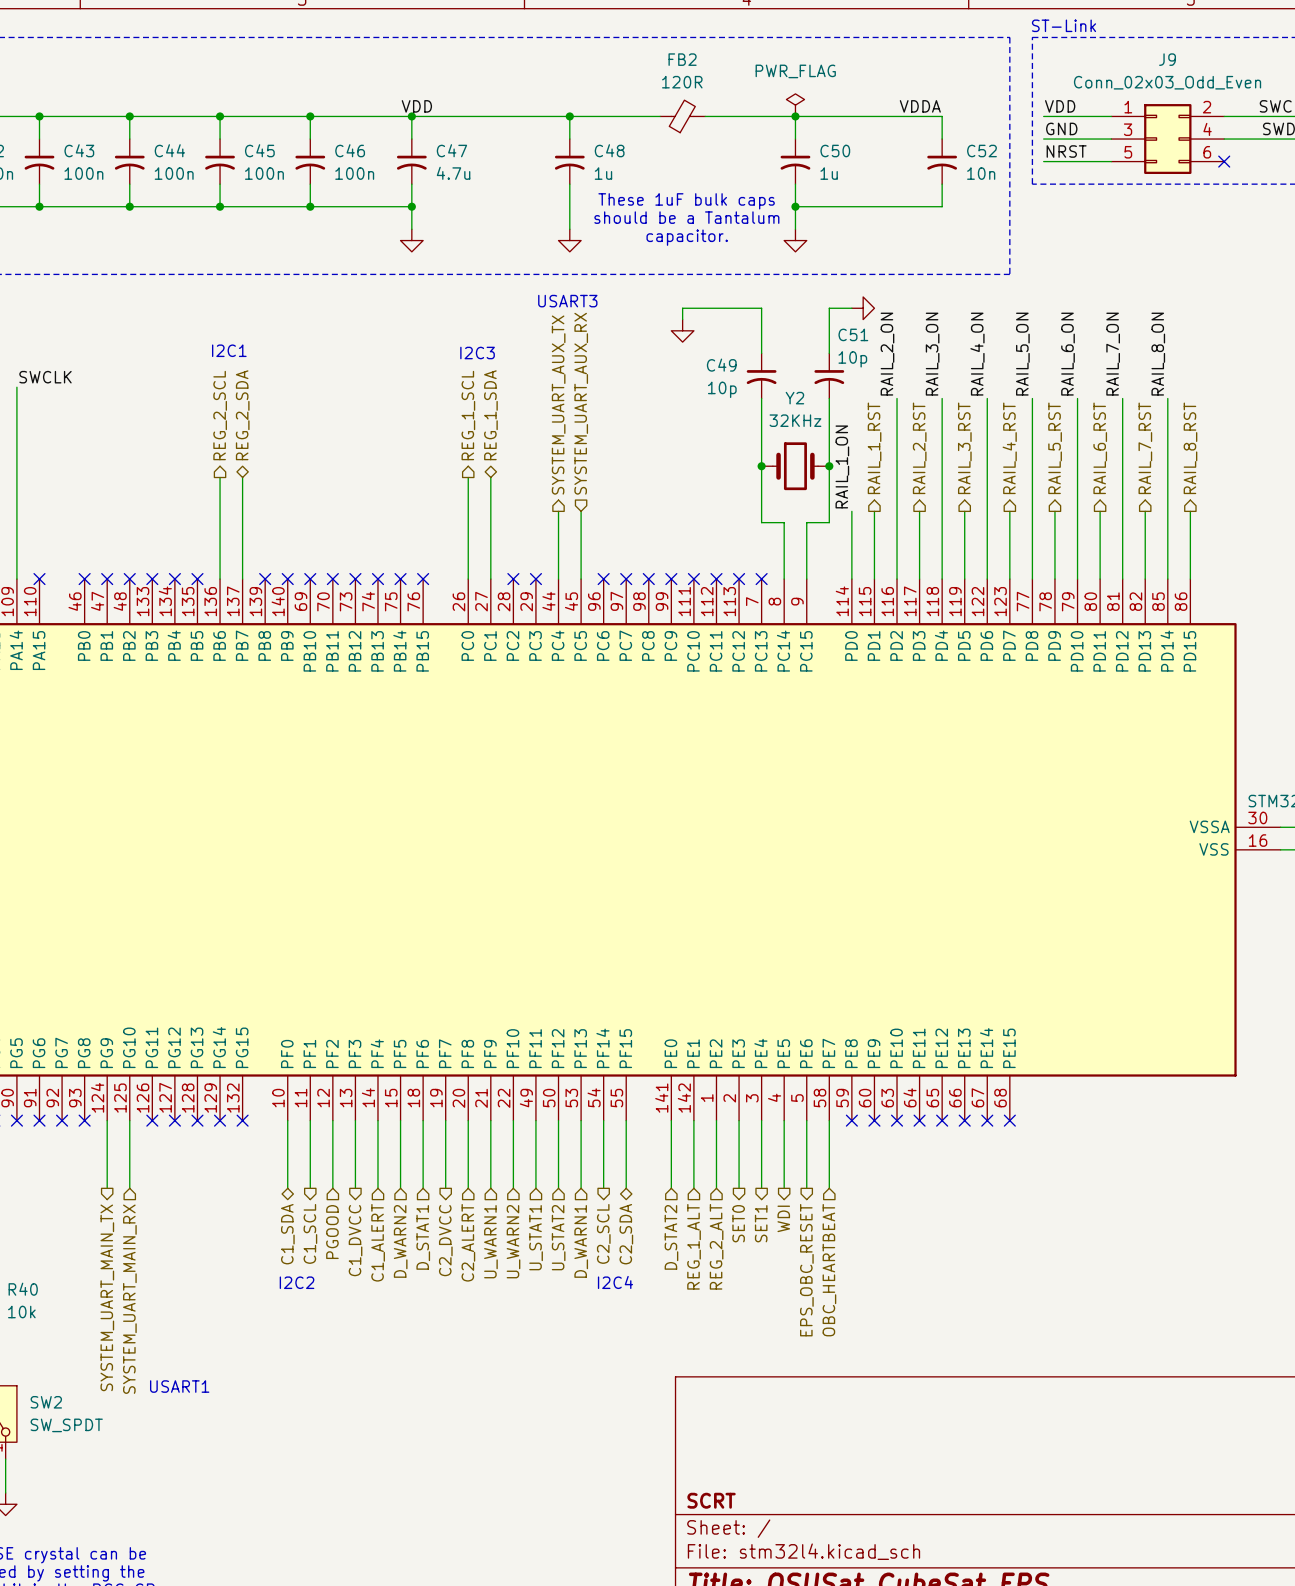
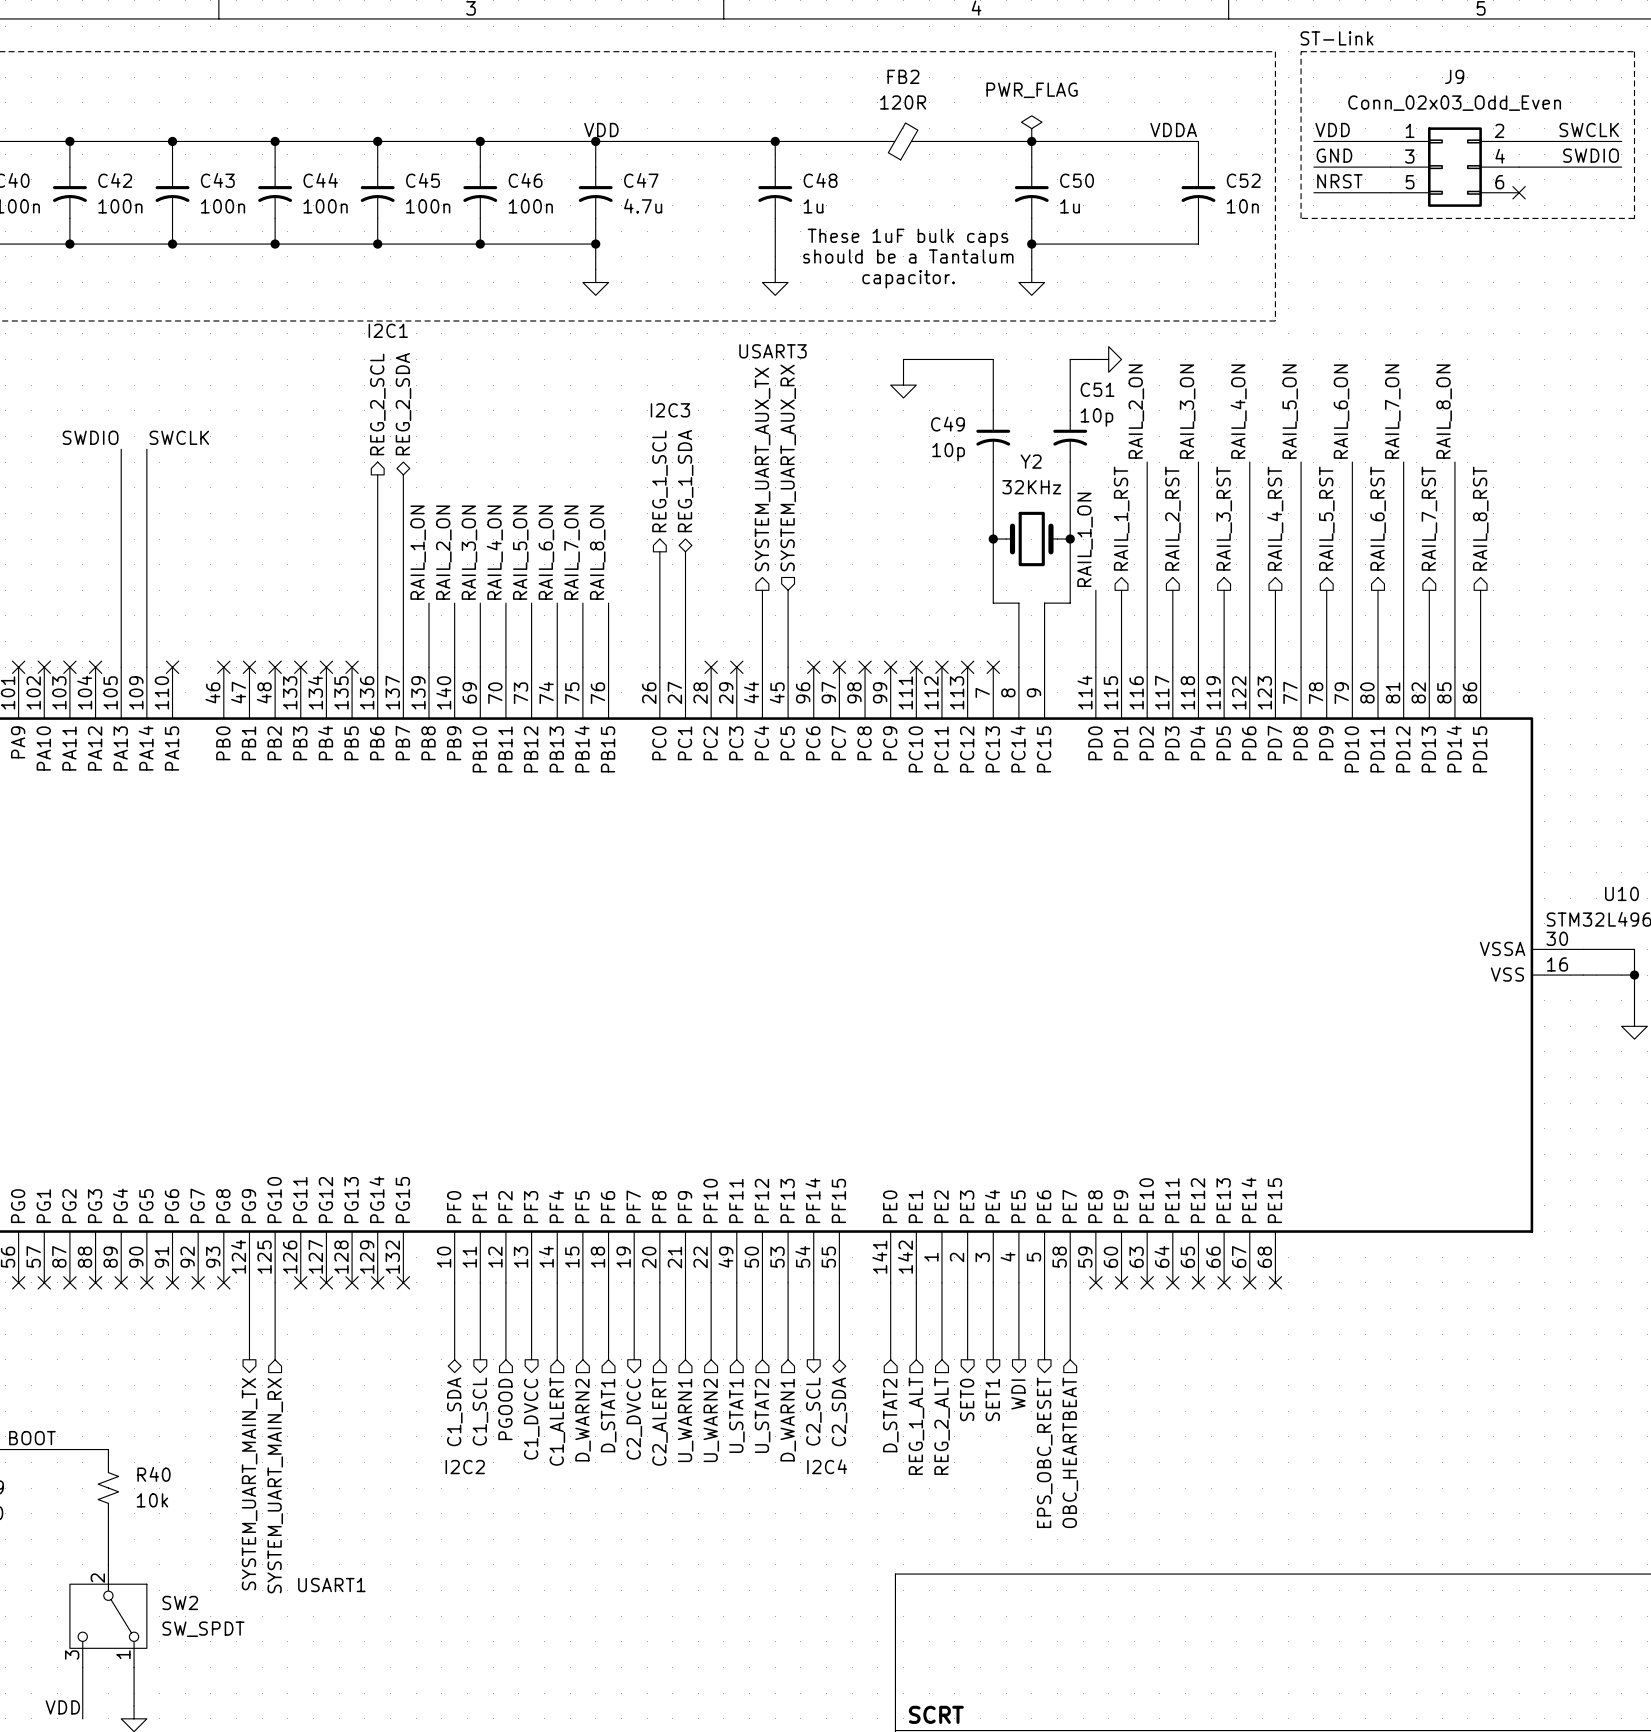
text position: I2C1 (229, 350) -> I2C1 (388, 330)
wire: none -> (377, 474) (377, 551)
wire: none -> (403, 474) (403, 551)
hierarchical label position: REG_2_SCL (220, 415) -> REG_2_SCL (377, 404)
hierarchical label position: REG_2_SDA (242, 415) -> REG_2_SDA (403, 404)
label: none -> RAIL_1_ON (418, 552)
label: none -> RAIL_2_ON (443, 552)
label: none -> RAIL_3_ON (469, 552)
label: none -> RAIL_4_ON (494, 552)
label: none -> RAIL_5_ON (520, 552)
label: none -> RAIL_6_ON (546, 552)
label: none -> RAIL_7_ON (572, 552)
label: none -> RAIL_8_ON (597, 552)
wire: none -> (429, 603) (429, 667)
wire: none -> (454, 603) (454, 667)
wire: none -> (480, 603) (480, 667)
wire: none -> (505, 603) (505, 667)
wire: none -> (531, 603) (531, 667)
wire: none -> (557, 603) (557, 667)
wire: none -> (582, 603) (582, 667)
wire: none -> (608, 603) (608, 667)
no-connect mark: (265, 579) -> none
no-connect mark: (287, 579) -> none
no-connect mark: (310, 579) -> none
no-connect mark: (332, 579) -> none
no-connect mark: (355, 579) -> none
no-connect mark: (377, 579) -> none
no-connect mark: (400, 579) -> none
no-connect mark: (423, 579) -> none

